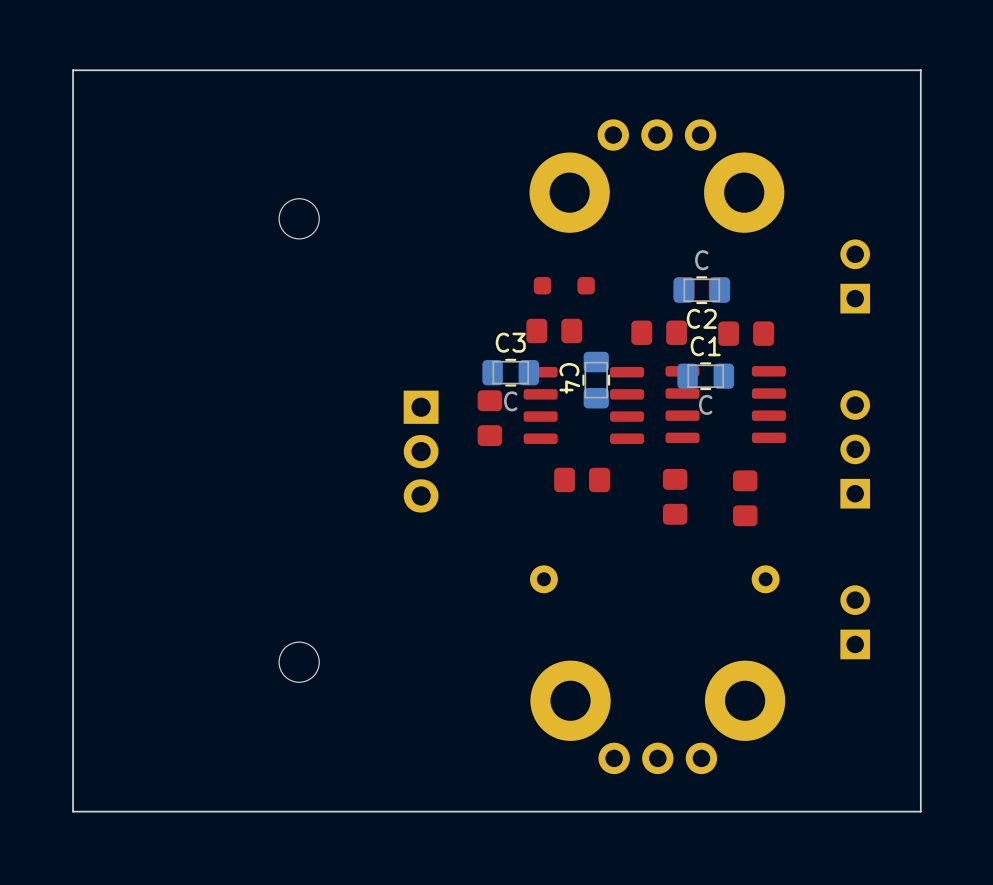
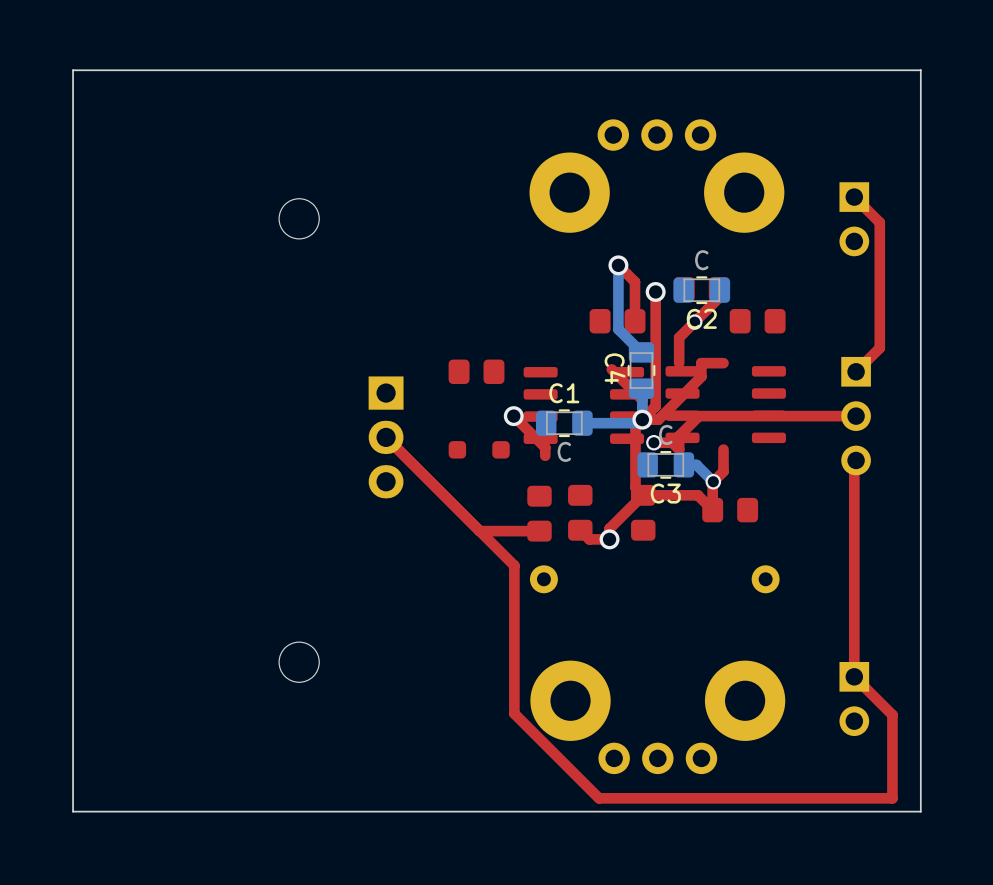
top track: none -> (854, 197) (879, 222) (879, 348) (856, 371)
top track: none -> (618, 265) (634, 281) (634, 321)
bottom track: none -> (618, 265) (618, 329) (641, 352)
via: none -> (618, 265)
part rotation: 0° (855, 276) -> 180° (854, 219)
part position: (855, 276) -> (854, 219)
part position: (564, 285) -> (479, 449)
top track: none -> (655, 291) (655, 406) (635, 426) (635, 487) (643, 495)
via: none -> (655, 291)
top track: none -> (721, 295) (679, 337) (679, 363)
part: none -> (617, 321)
via: none -> (694, 322)
part: (554, 330) -> none
part: (659, 332) -> none
part position: (746, 333) -> (757, 321)
C3 name position: C3 (510, 342) -> C3 (665, 493)
top track: none -> (723, 363) (701, 363) (701, 376) (658, 419) (642, 419) (642, 399) (611, 369)
part: none -> (476, 371)
C3 position: (510, 372) -> (665, 464)
C1 position: (705, 376) -> (564, 423)
C4 position: (596, 380) -> (641, 370)
bottom track: none -> (641, 388) (642, 419) (638, 423) (582, 423)
C3 value position: C (510, 401) -> C (665, 434)
top track: none -> (513, 416) (545, 447) (545, 455)
via: none -> (513, 416)
top track: none -> (856, 416) (699, 416) (679, 435) (679, 449) (672, 442) (653, 442)
part: (489, 418) -> none
via: none -> (642, 419)
top track: none -> (386, 437) (514, 565) (514, 713) (599, 798) (892, 798) (892, 714) (854, 676) (854, 462) (856, 460)
via: none -> (653, 442)
top track: none -> (723, 449) (723, 471) (712, 482) (712, 510) (697, 495) (642, 495) (609, 528) (609, 539) (589, 539) (580, 530)
part rotation: 0° (855, 449) -> 180° (856, 416)
part position: (421, 451) -> (386, 437)
bottom track: none -> (683, 464) (696, 464) (713, 481)
part: (582, 479) -> none
via: none -> (713, 481)
part: (675, 496) -> none
part rotation: 0° (745, 498) -> 90° clockwise (730, 510)
part: none -> (580, 512)
part: none -> (643, 512)
part: none -> (539, 513)
top track: none -> (539, 531) (479, 531)
via: none -> (609, 539)
part rotation: 0° (855, 622) -> 180° (854, 699)
part position: (855, 622) -> (854, 699)

